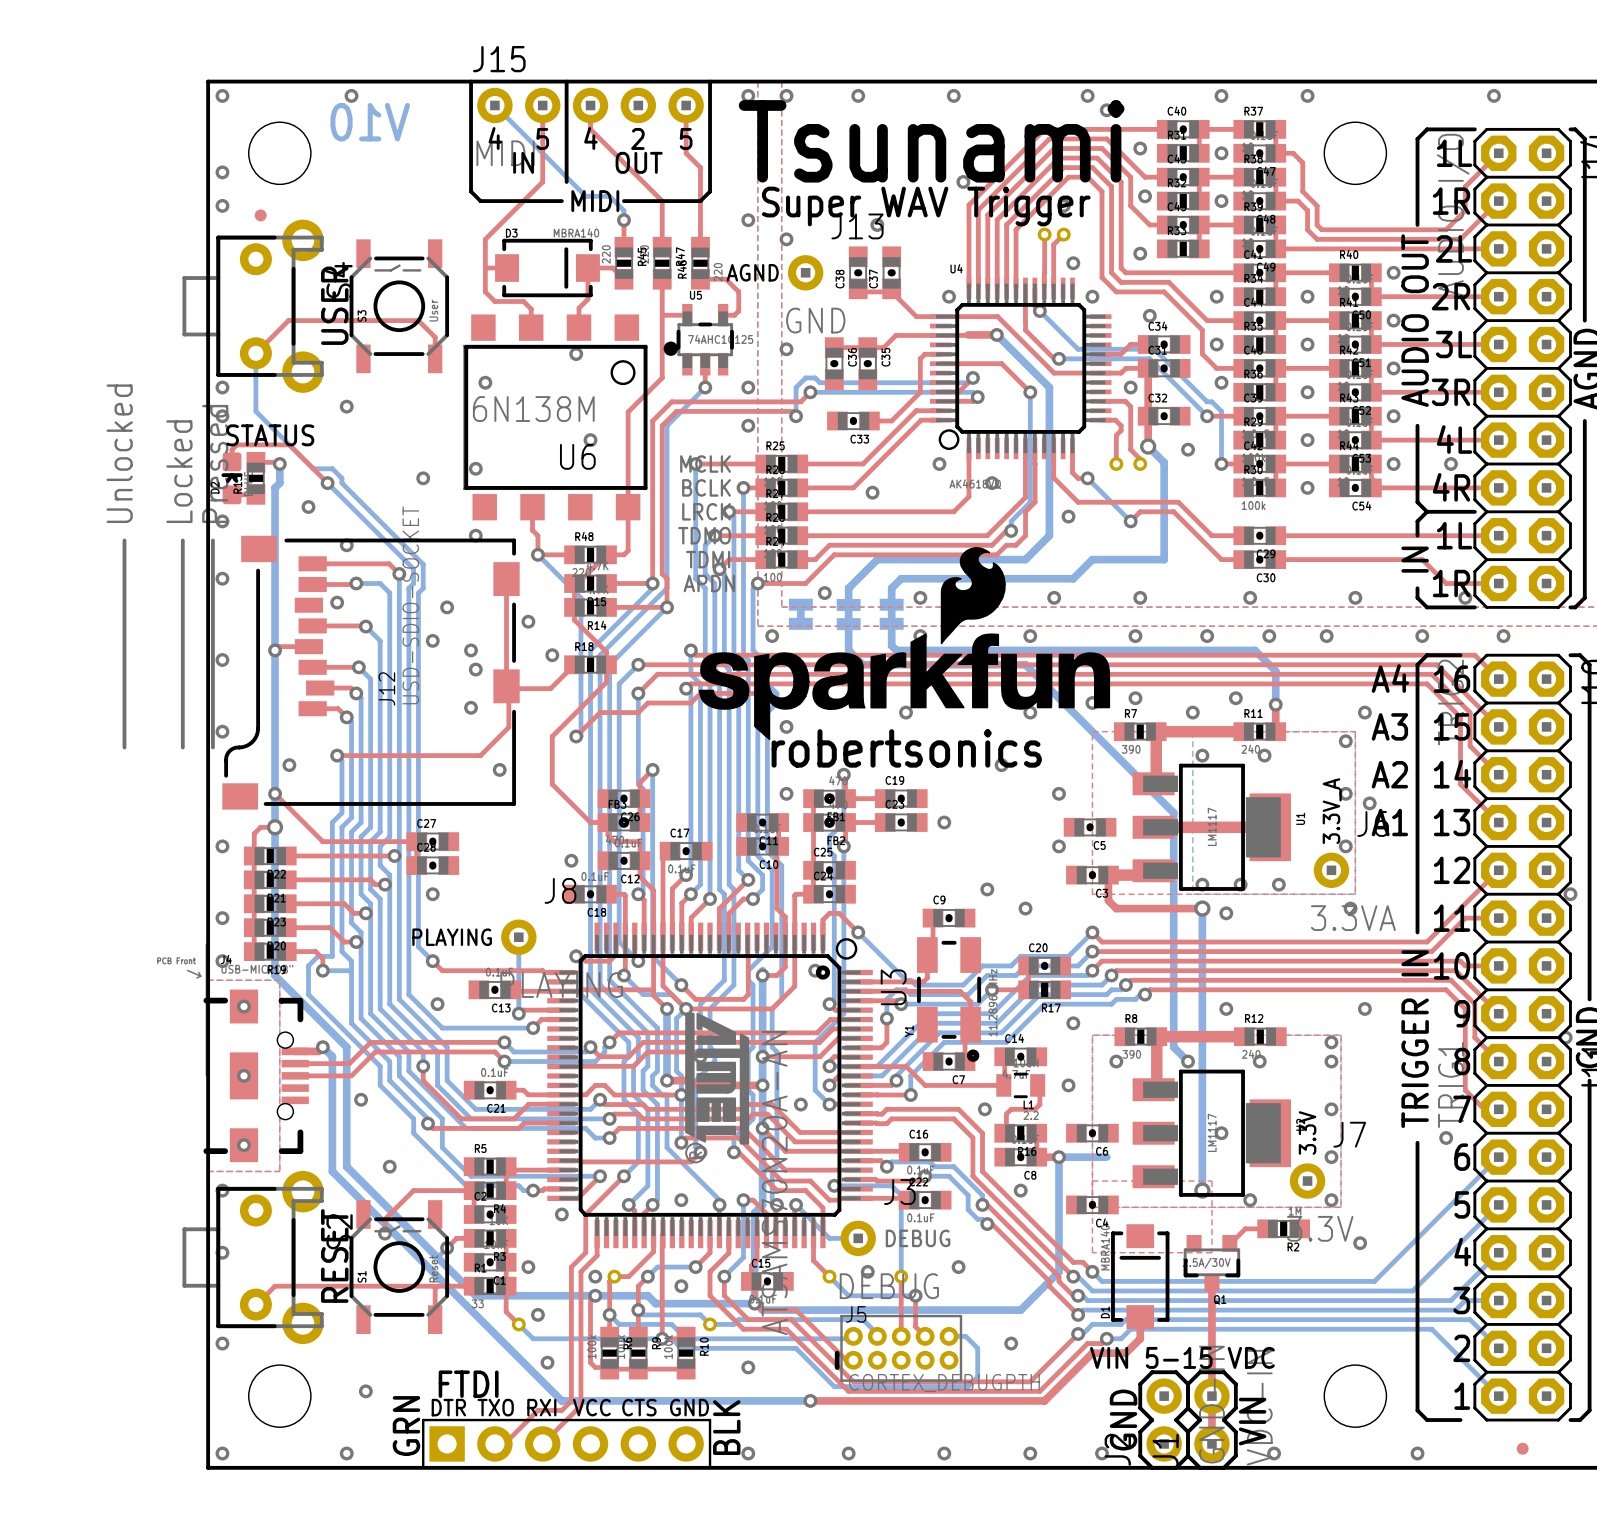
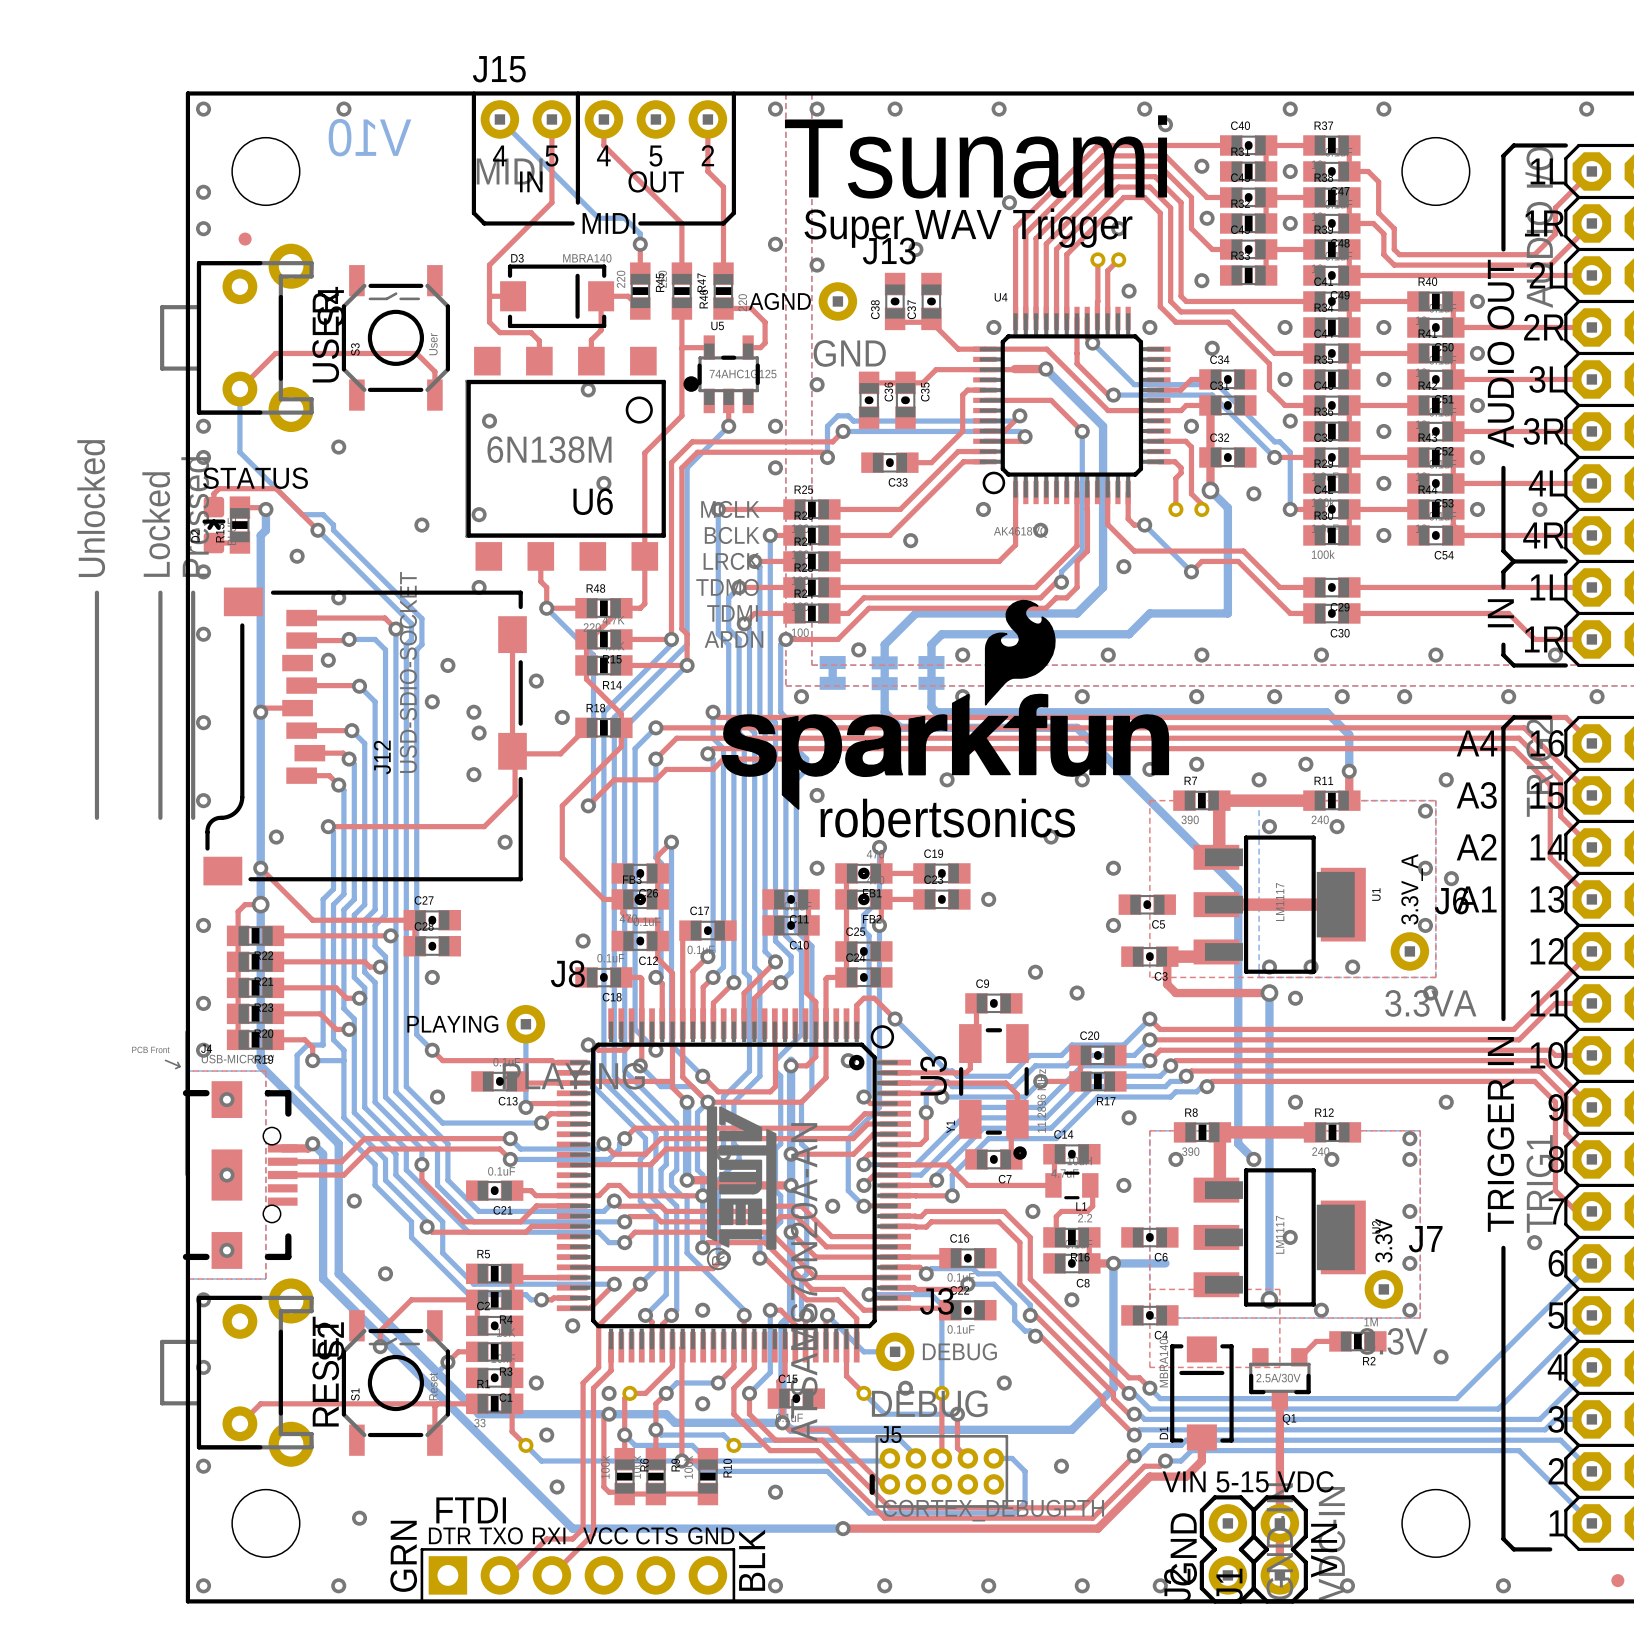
text: 2 (637, 138) -> 5 (655, 156)
text: 5 (686, 138) -> 2 (707, 155)

